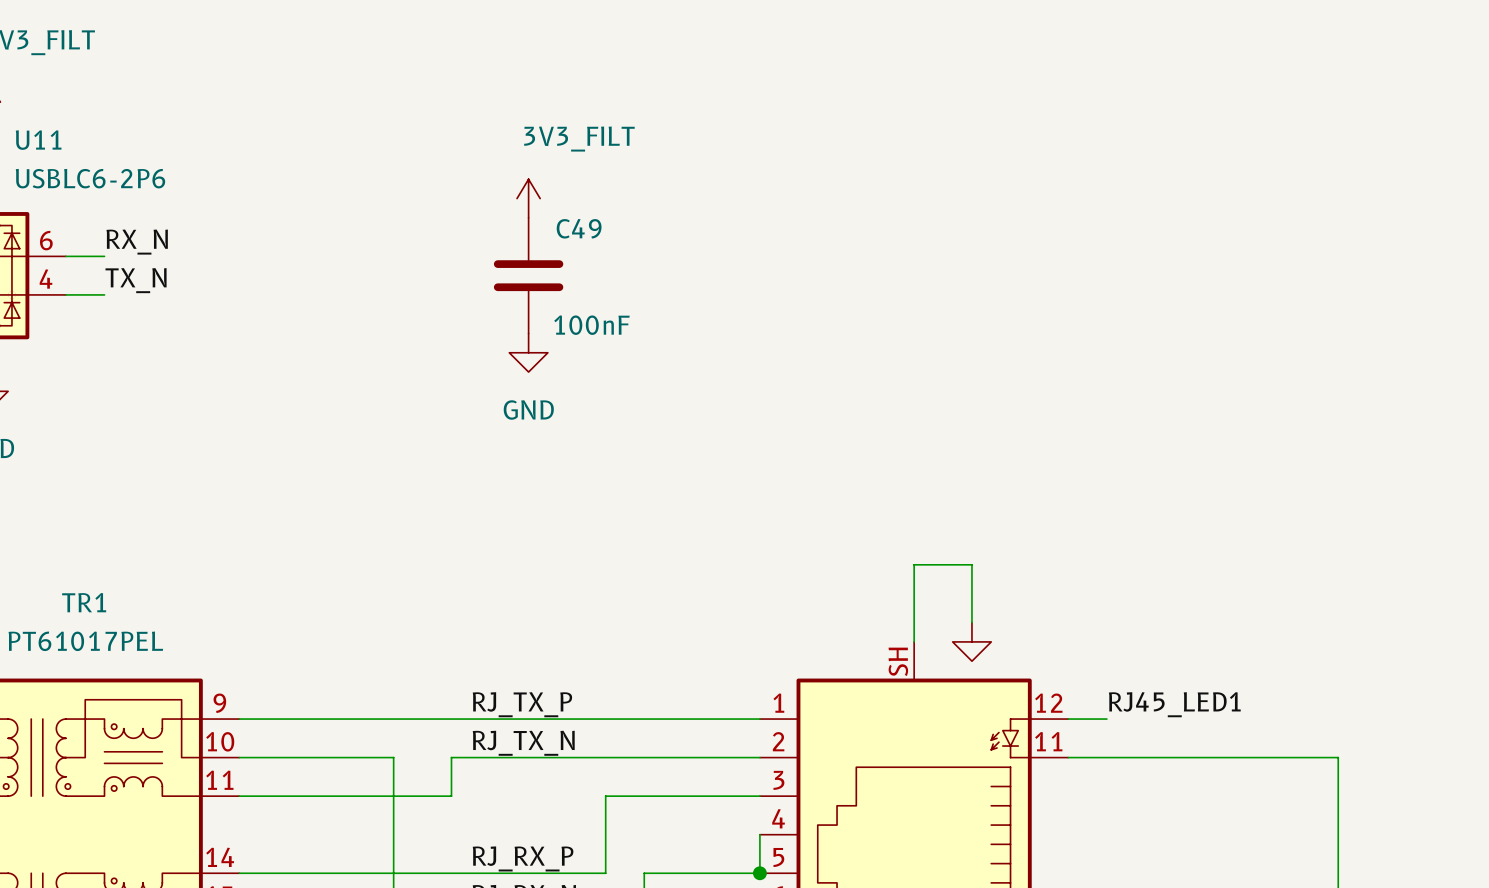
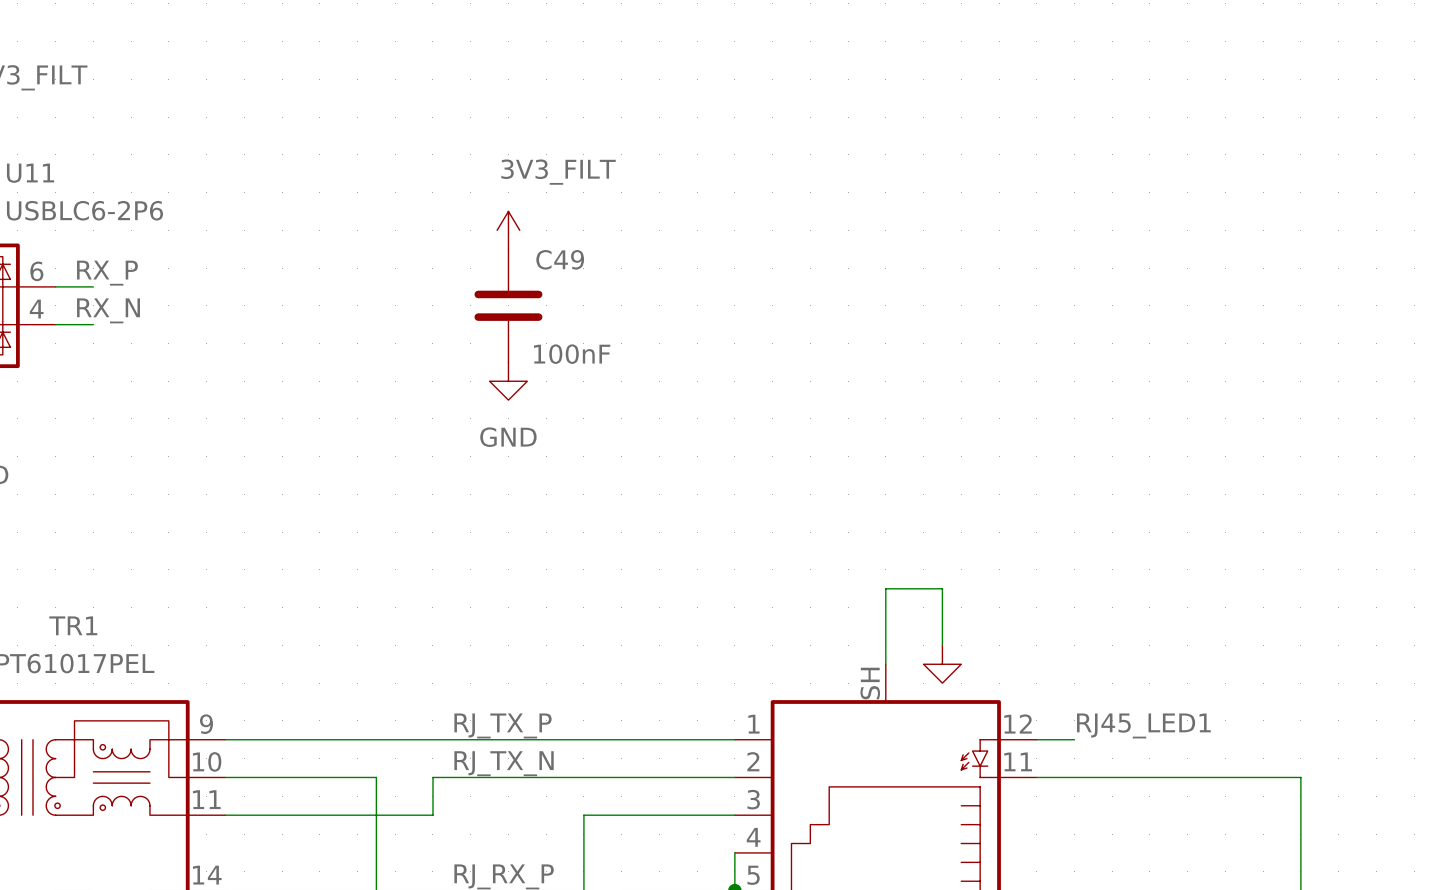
label: none -> RX_P (107, 273)
label position: RX_N (137, 242) -> RX_N (108, 310)
label: TX_N (136, 280) -> none

